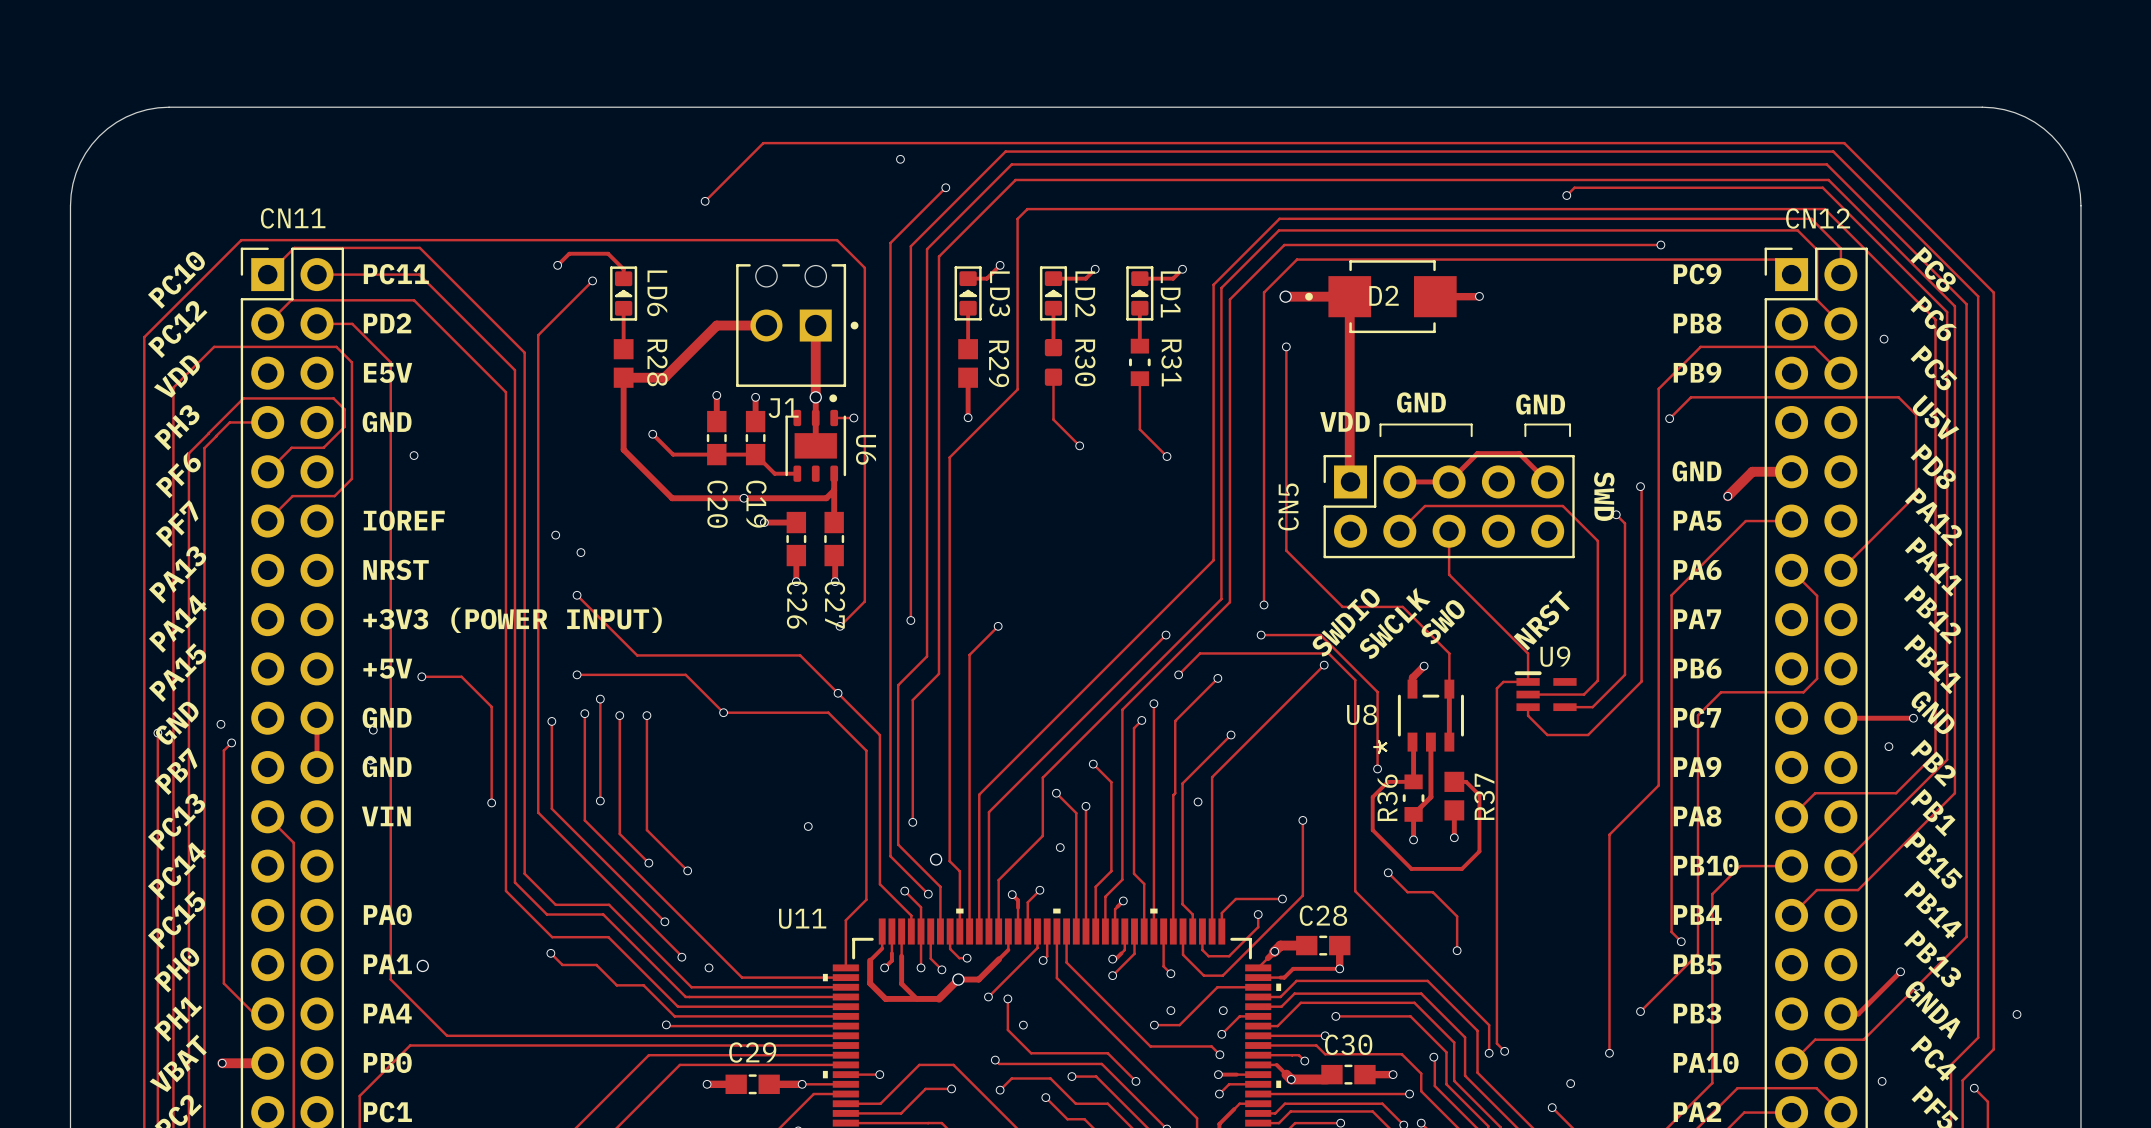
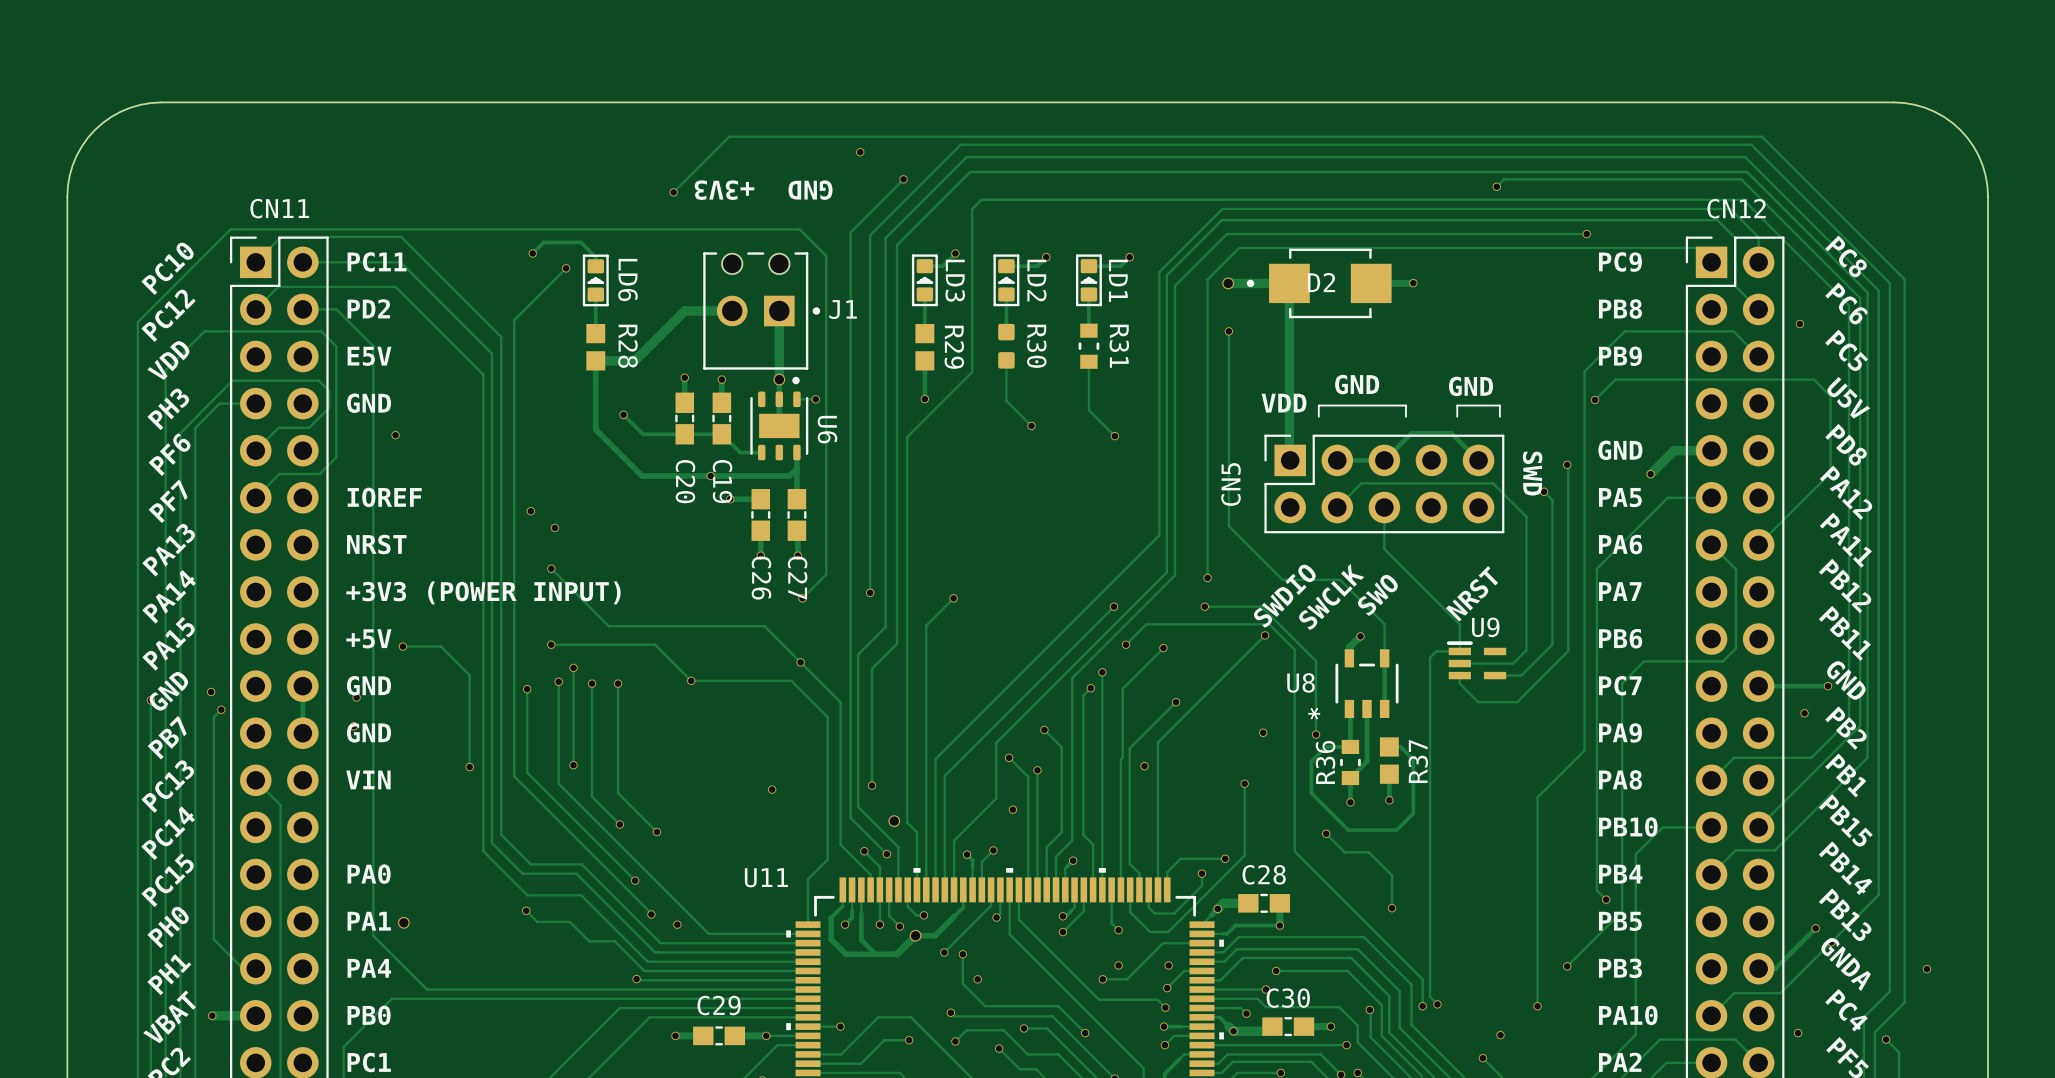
text: none -> +3V3 (724, 190)
text: none -> GND (810, 190)
J1 name position: J1 (783, 408) -> J1 (843, 309)
via: none -> (1263, 732)

